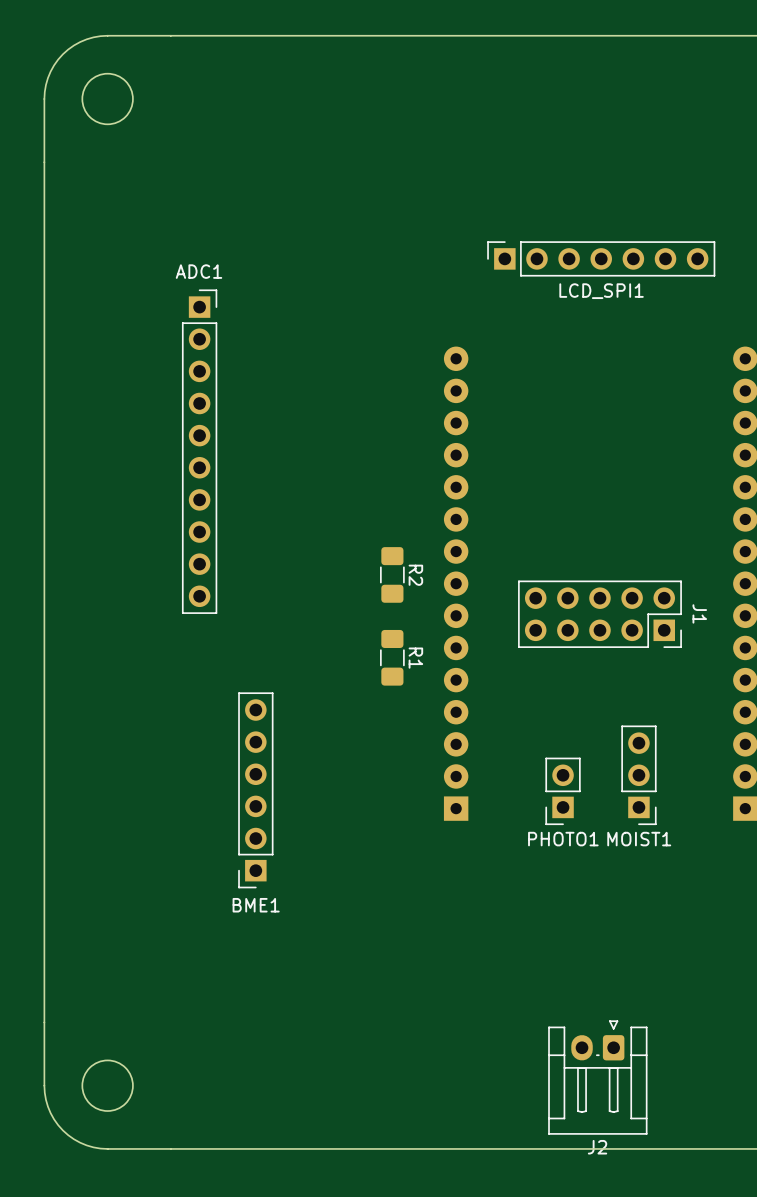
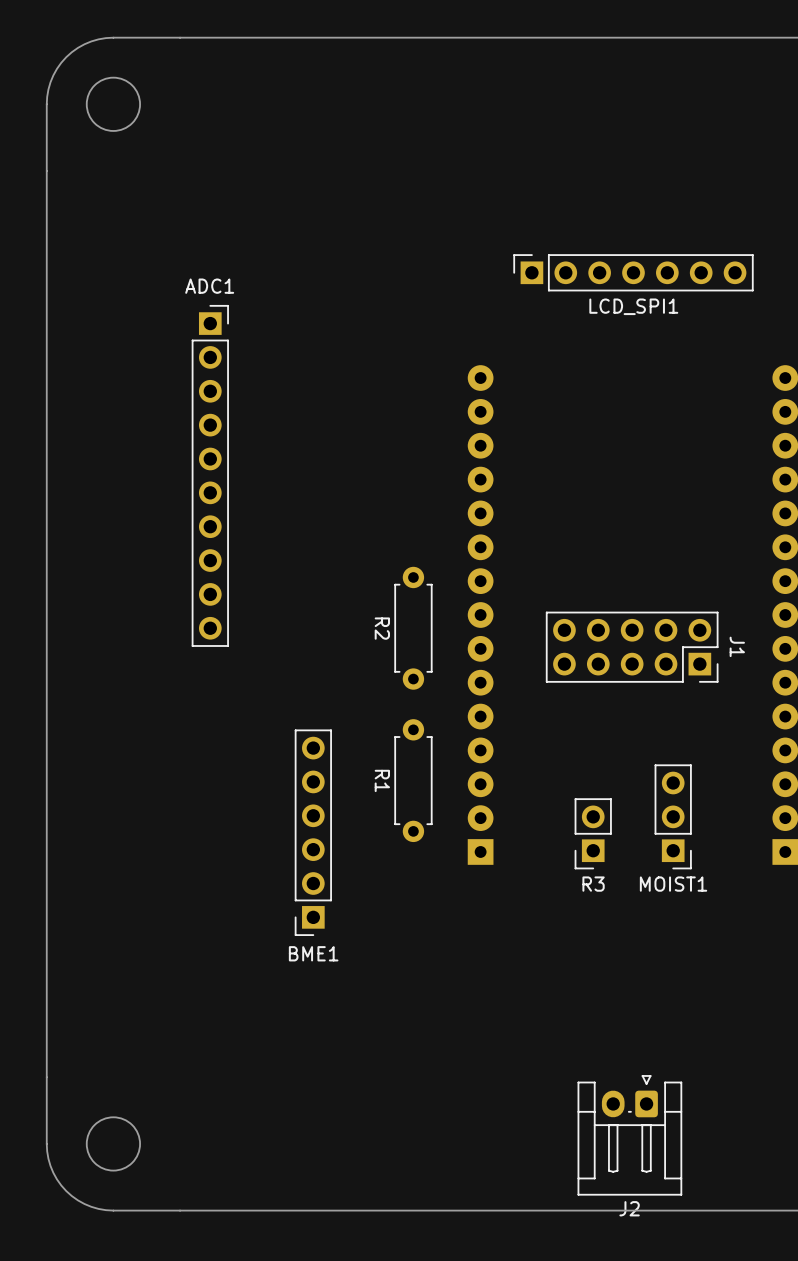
R2 footprint: [380, 547, 405, 603] -> [394, 566, 433, 690]
R2 name position: R2 (415, 575) -> R2 (382, 628)
R1 footprint: [380, 629, 405, 686] -> [394, 719, 433, 843]
R1 name position: R1 (415, 658) -> R1 (382, 780)
BME1 position: (255, 790) -> (313, 832)
PHOTO1 name: PHOTO1 (563, 839) -> R3 (593, 884)

